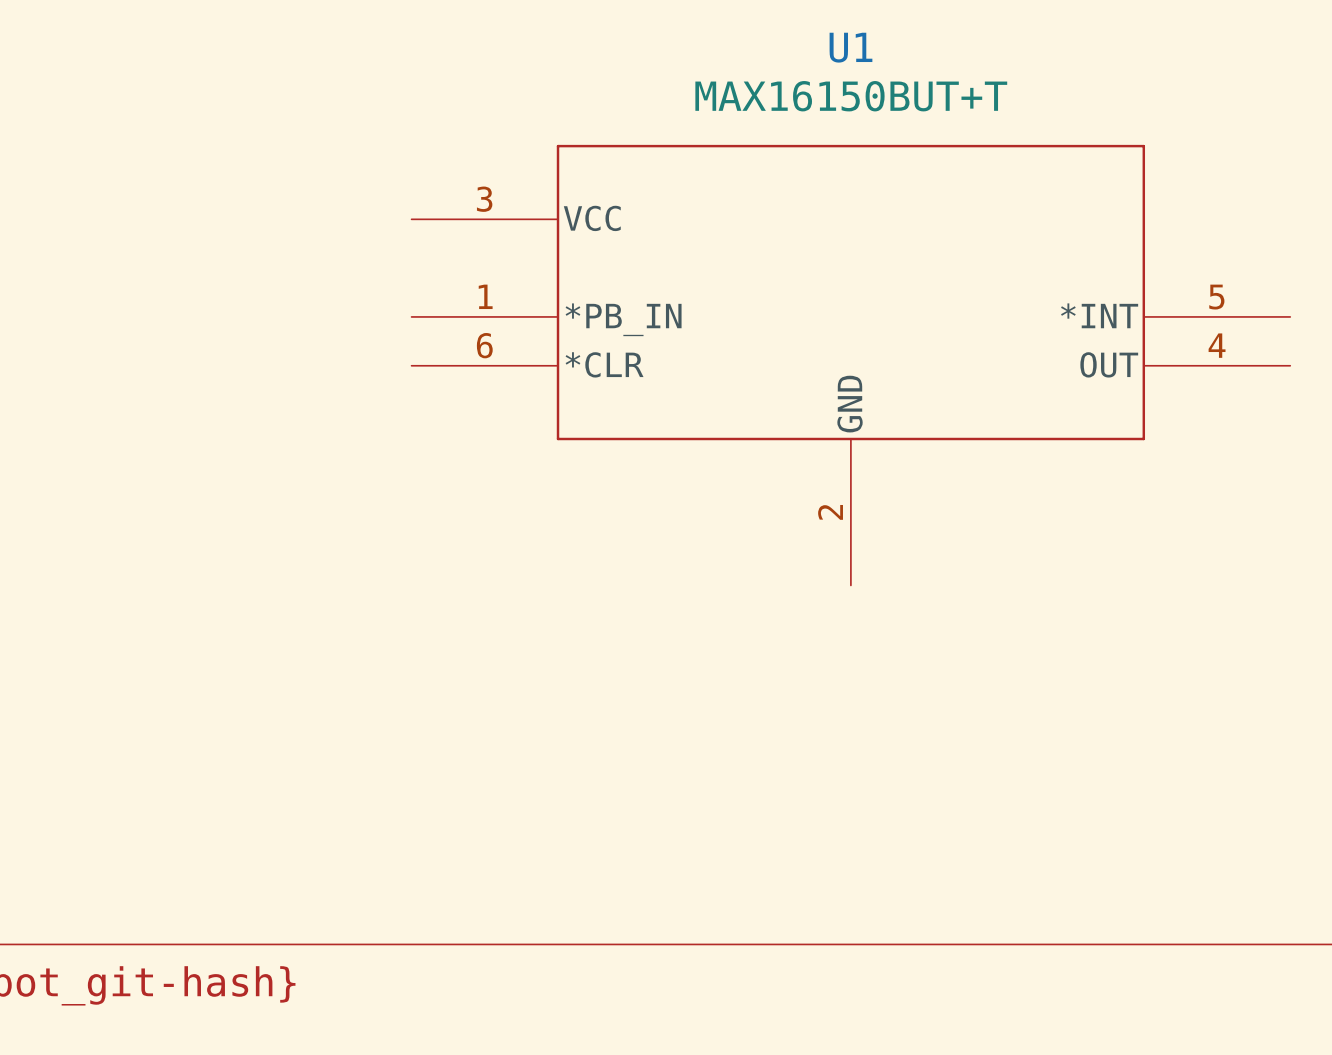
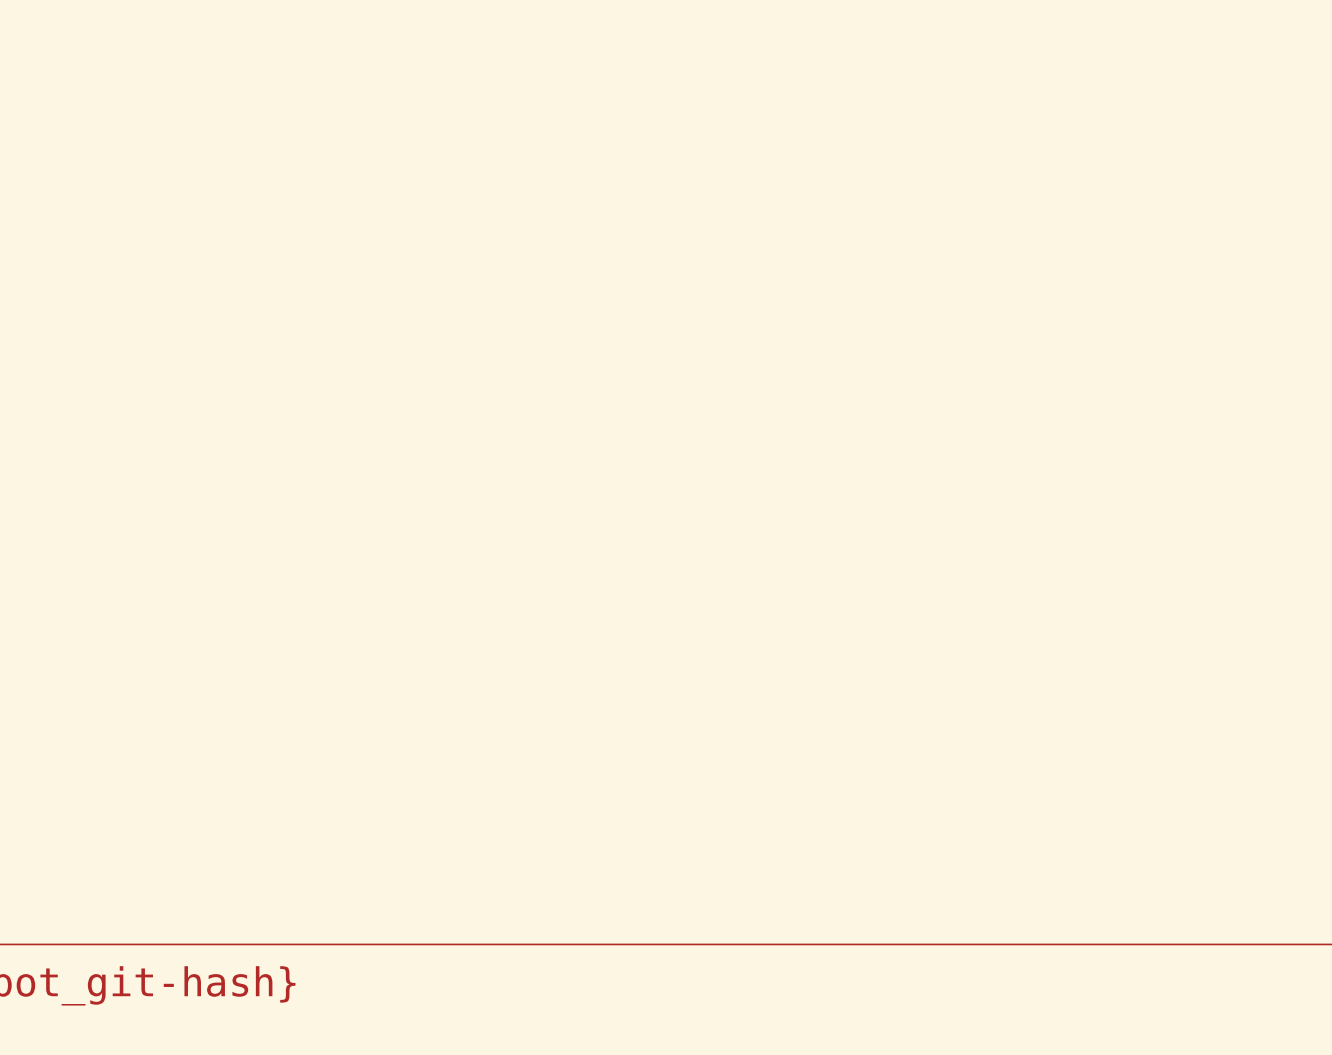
U1: MAX16150BUT+T (850, 365) -> none

